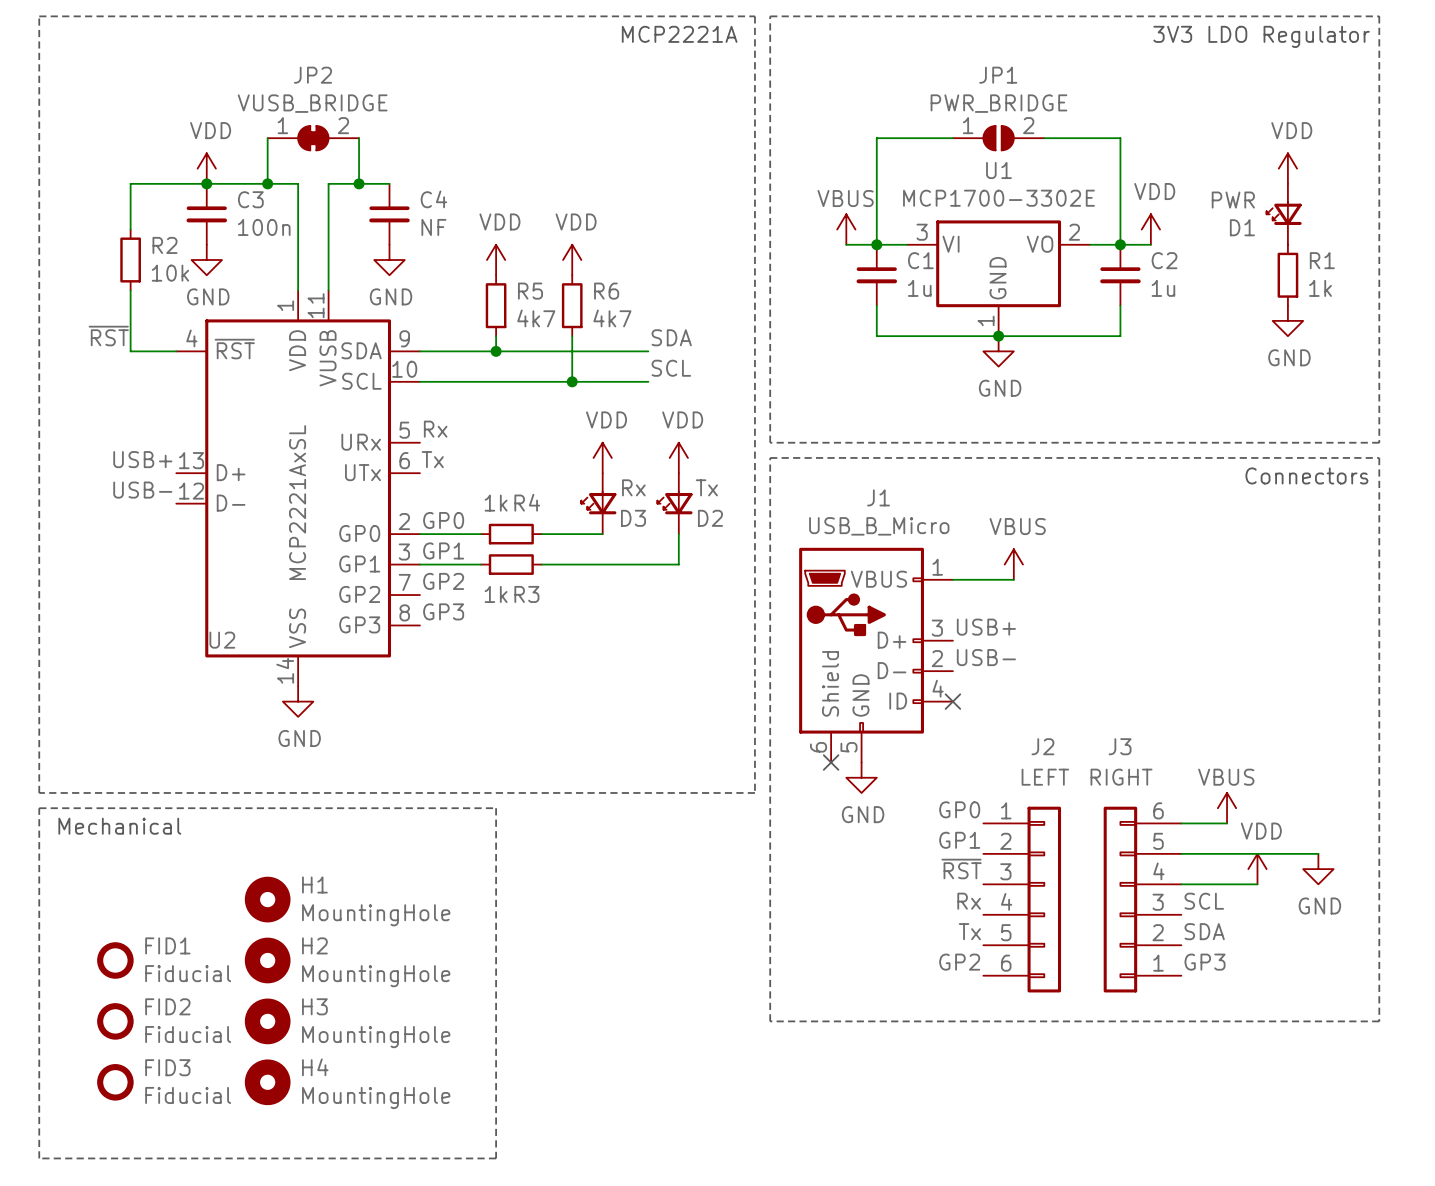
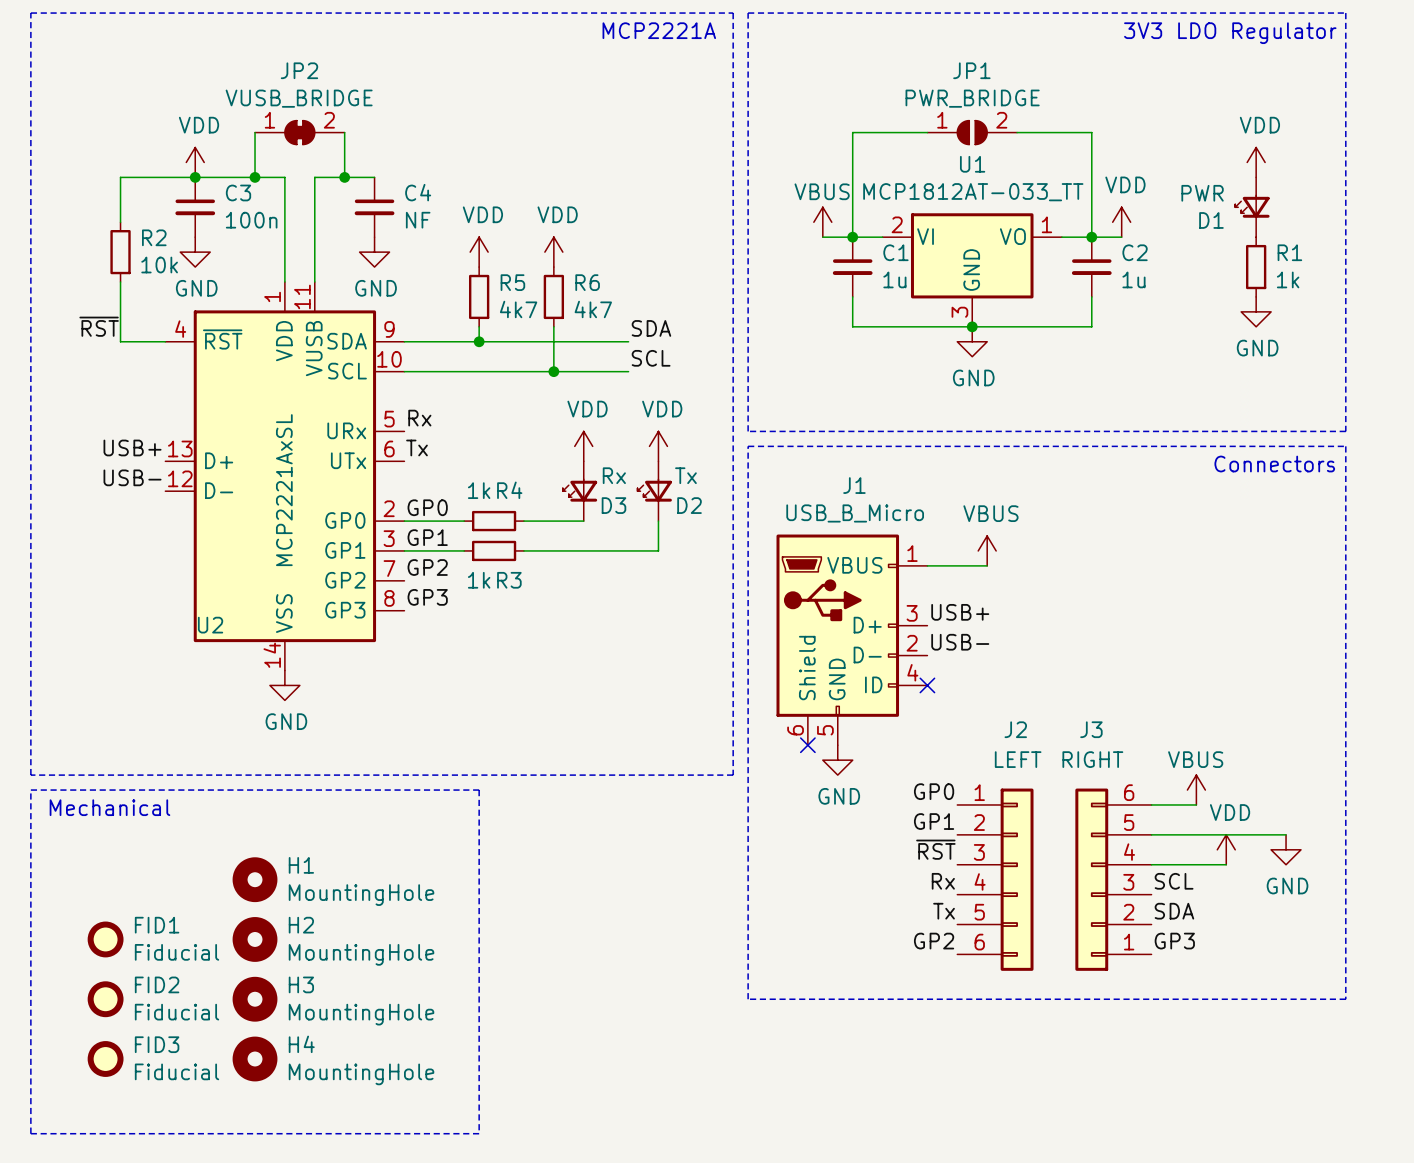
U1 value: MCP1700-3302E (998, 198) -> MCP1812AT-033_TT (973, 192)
U1 pin number: 3 (922, 232) -> 2 (897, 224)
U1 pin number: 2 (1074, 232) -> 1 (1046, 224)
U1 pin number: 1 (986, 320) -> 3 (959, 312)

